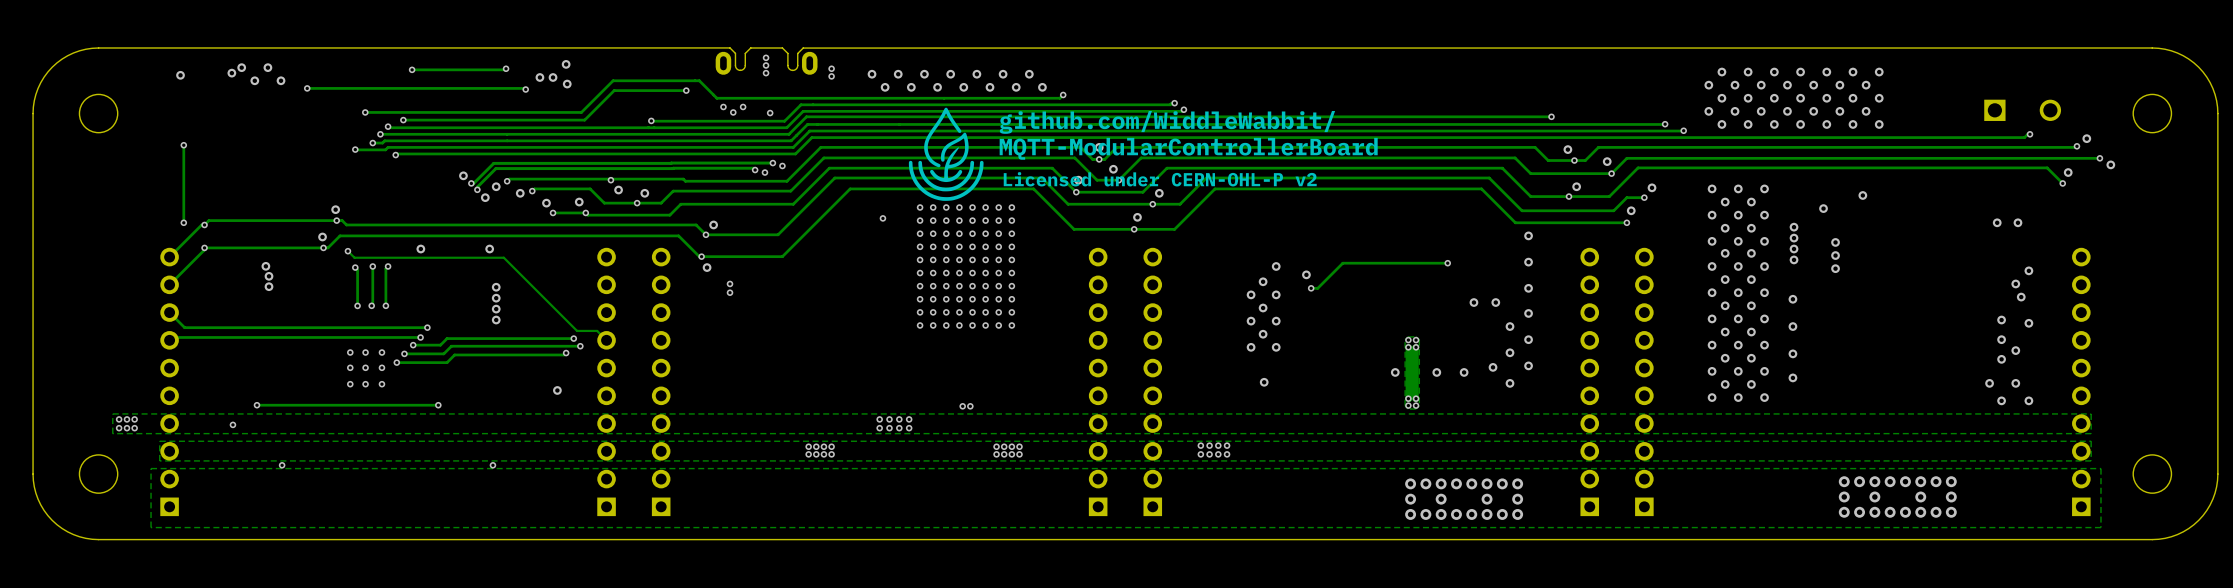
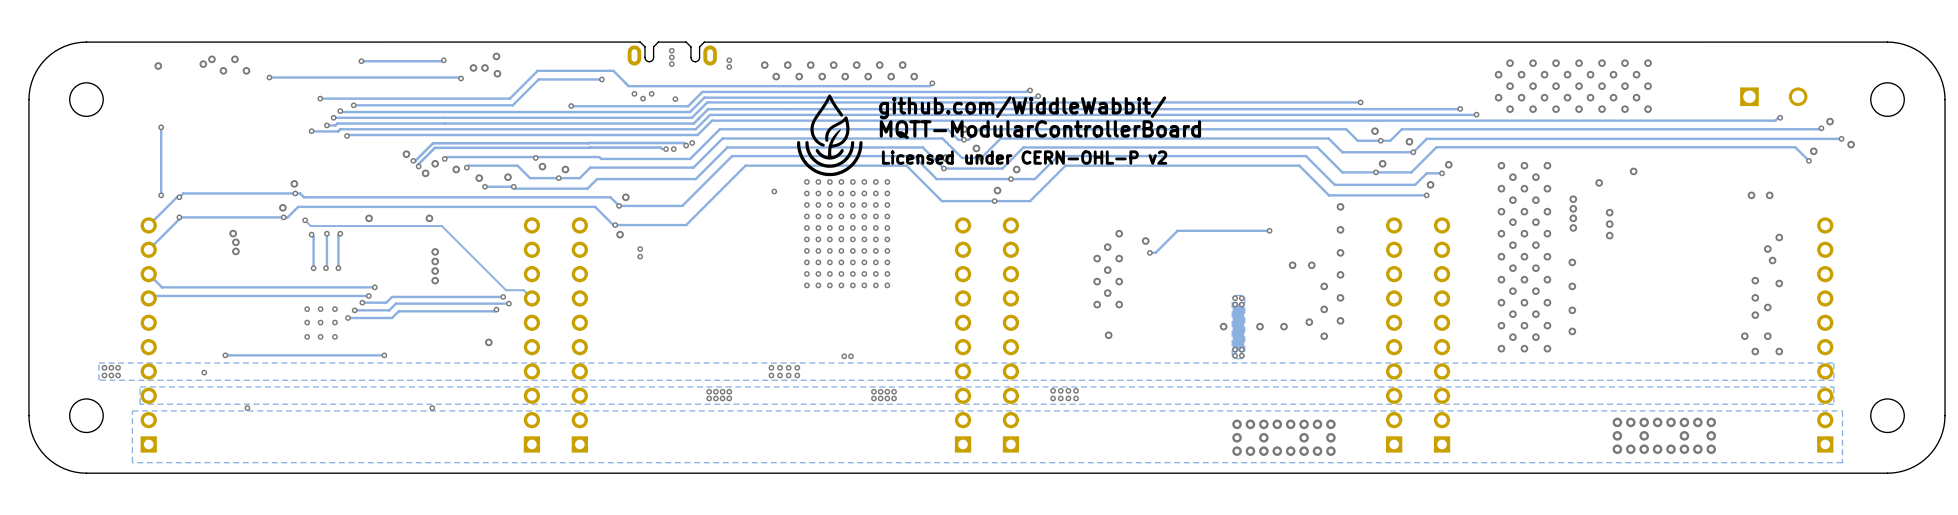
via: (772, 163) -> none
track: none -> (684, 143) (677, 143)
via: none -> (692, 143)
via: (755, 170) -> none
via: none -> (666, 149)
via: none -> (673, 149)
via: (764, 172) -> none

